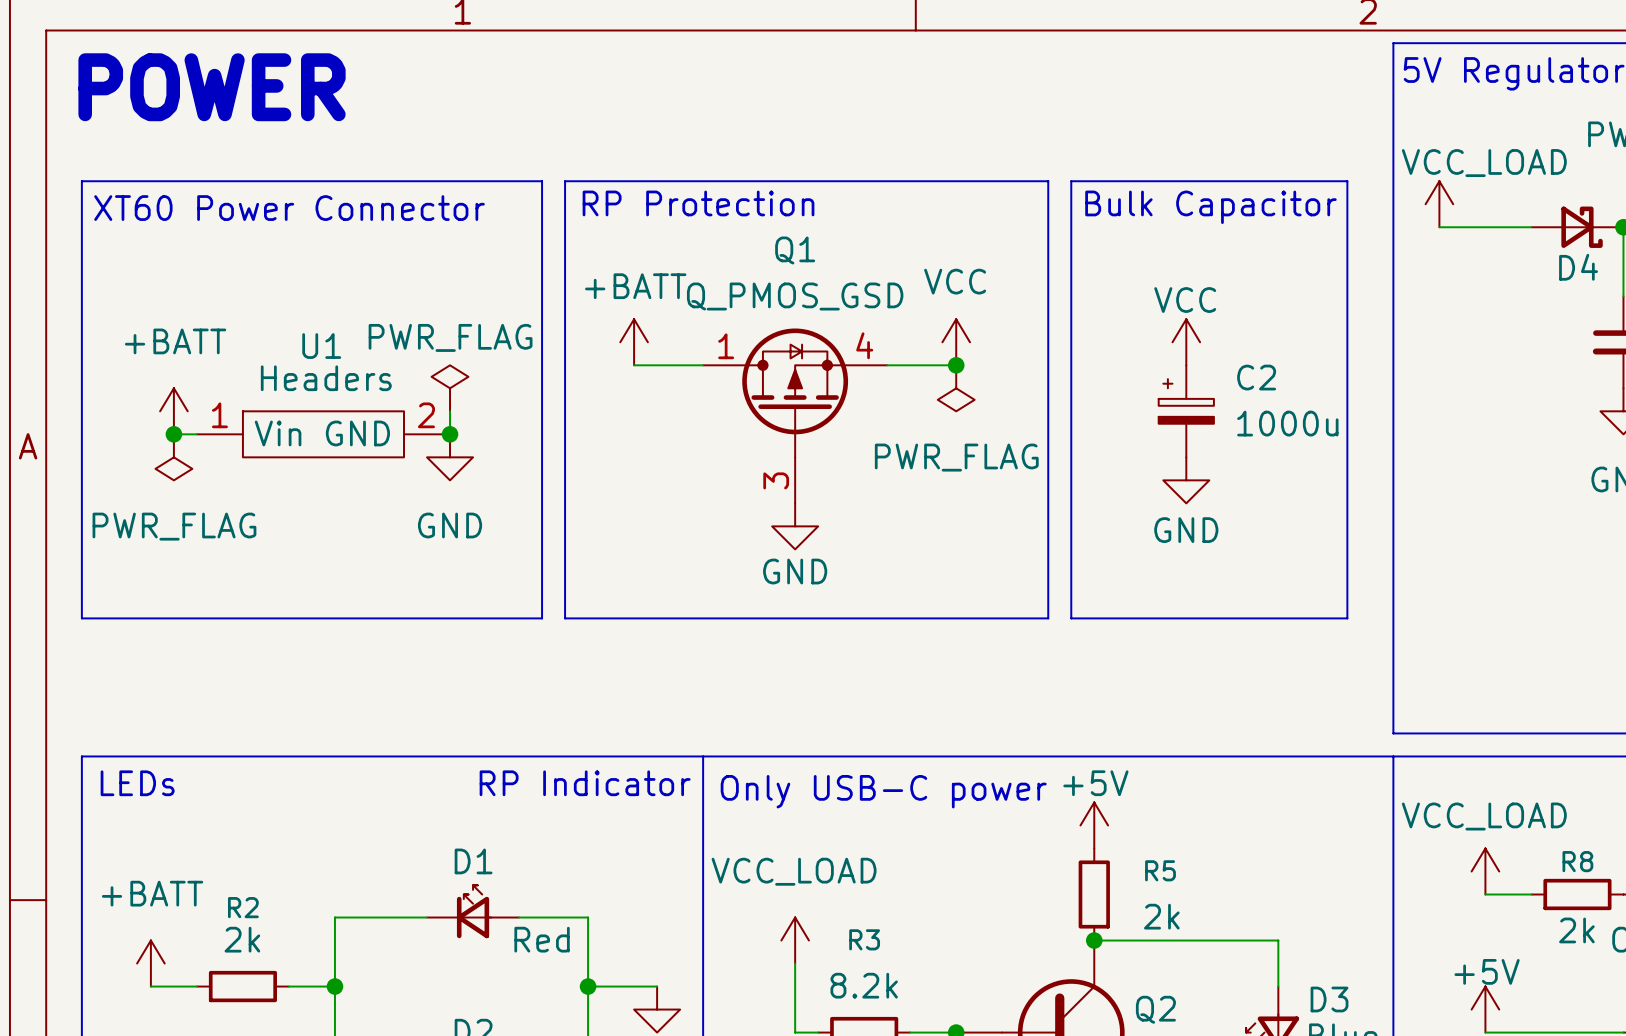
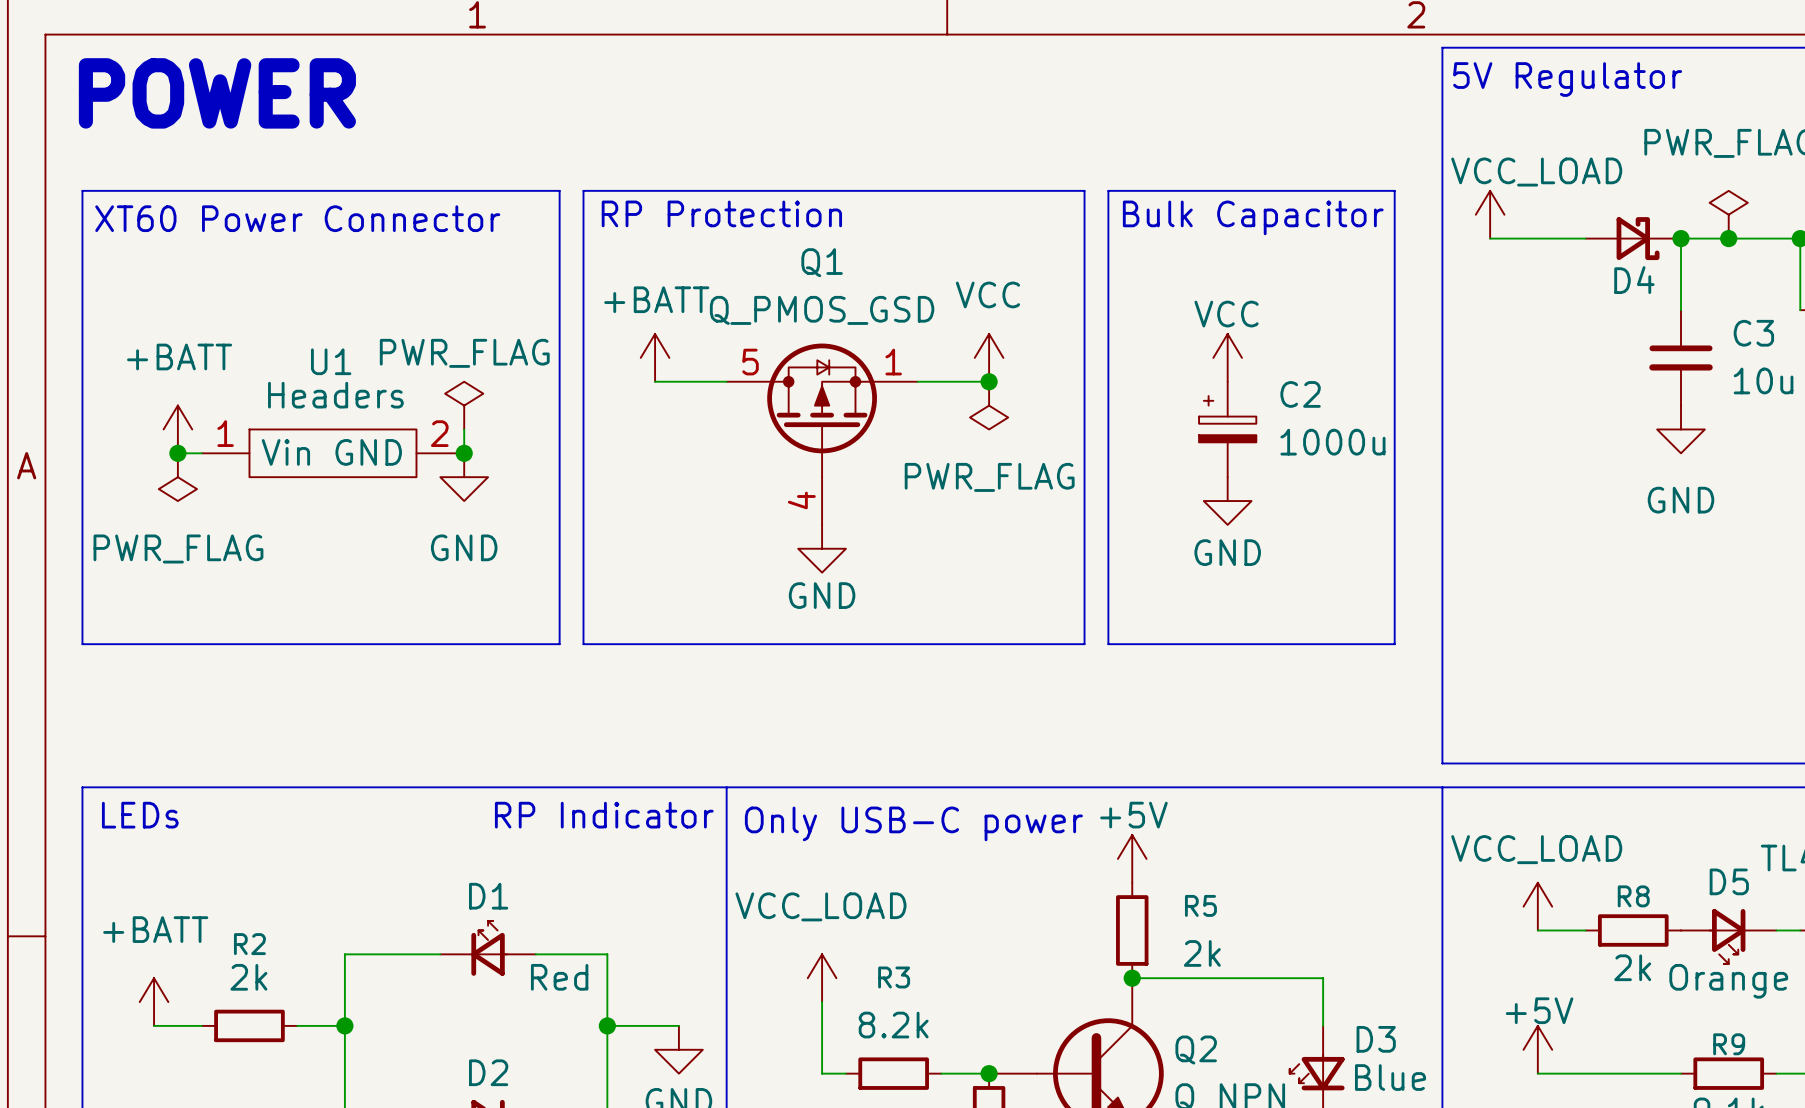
Q1 pin number: 4 (864, 345) -> 1 (893, 362)
Q1 pin number: 1 (726, 346) -> 5 (750, 362)
Q1 pin number: 3 (776, 480) -> 4 (801, 500)

